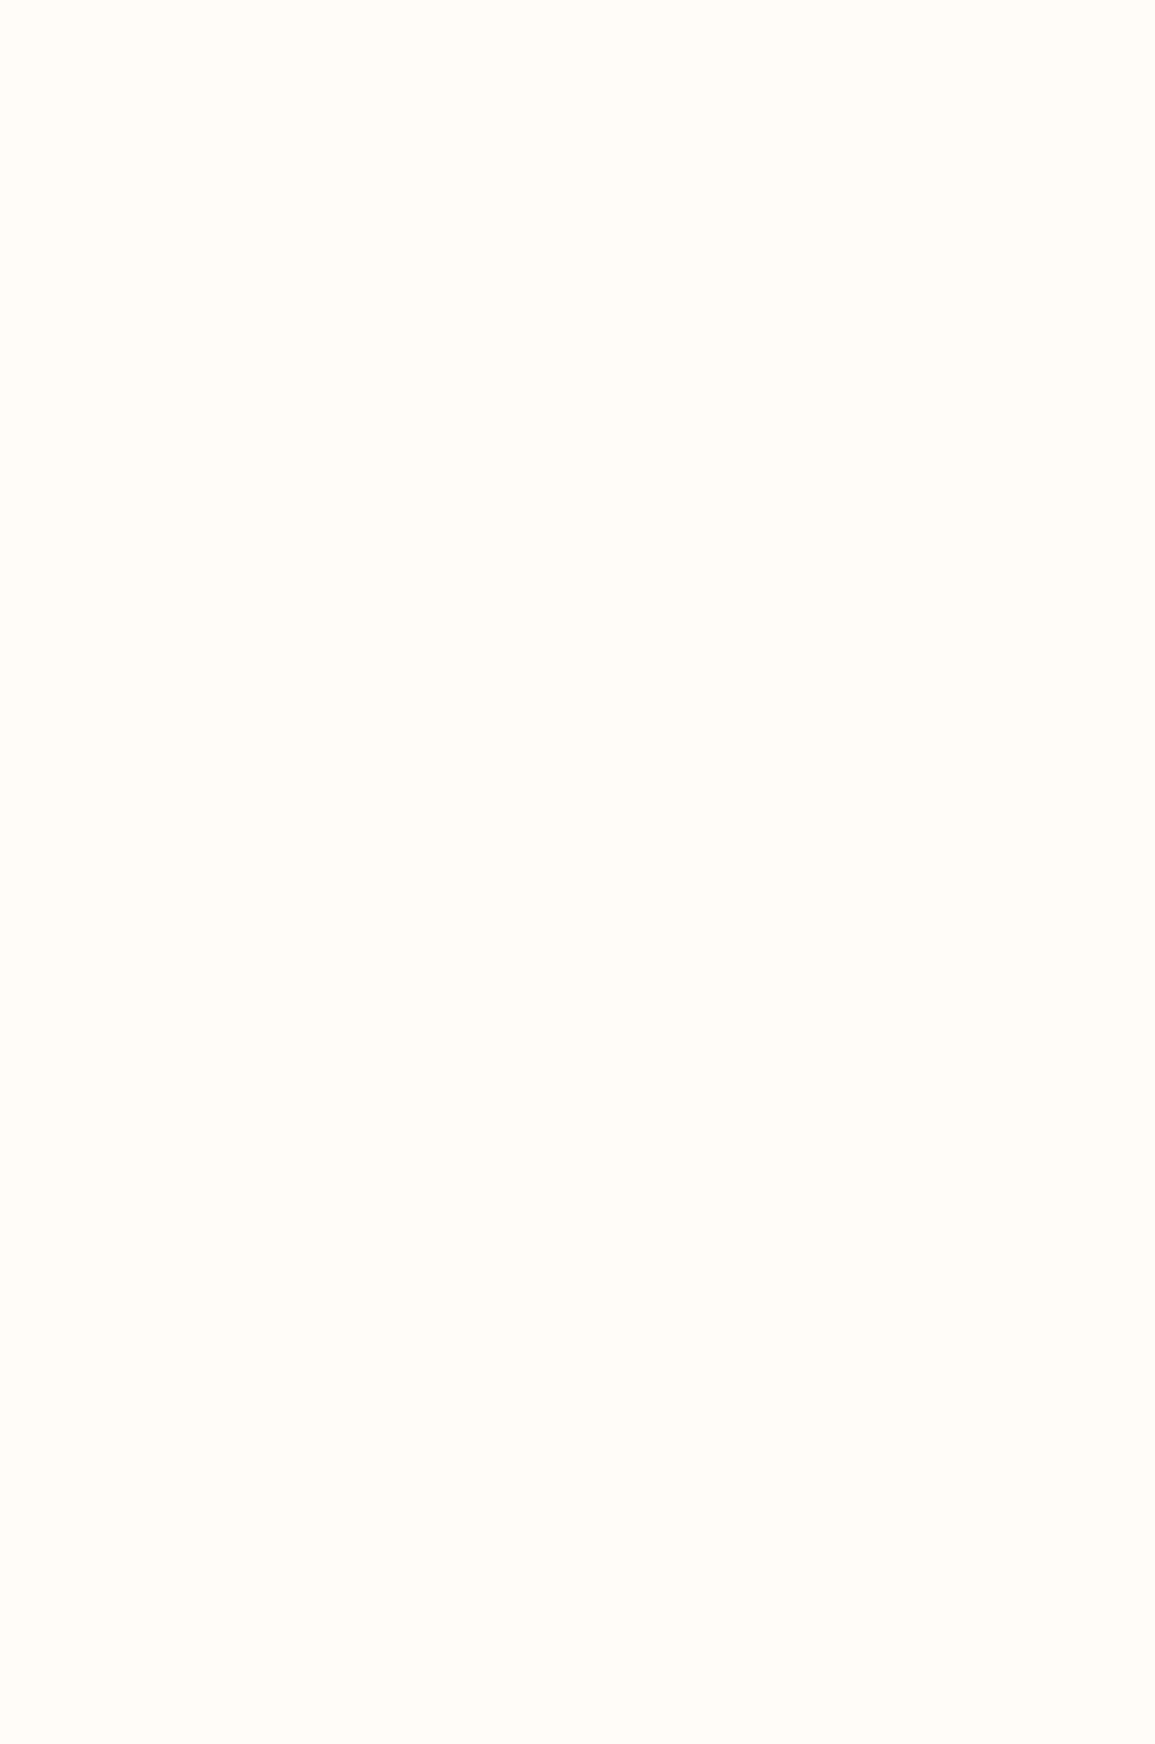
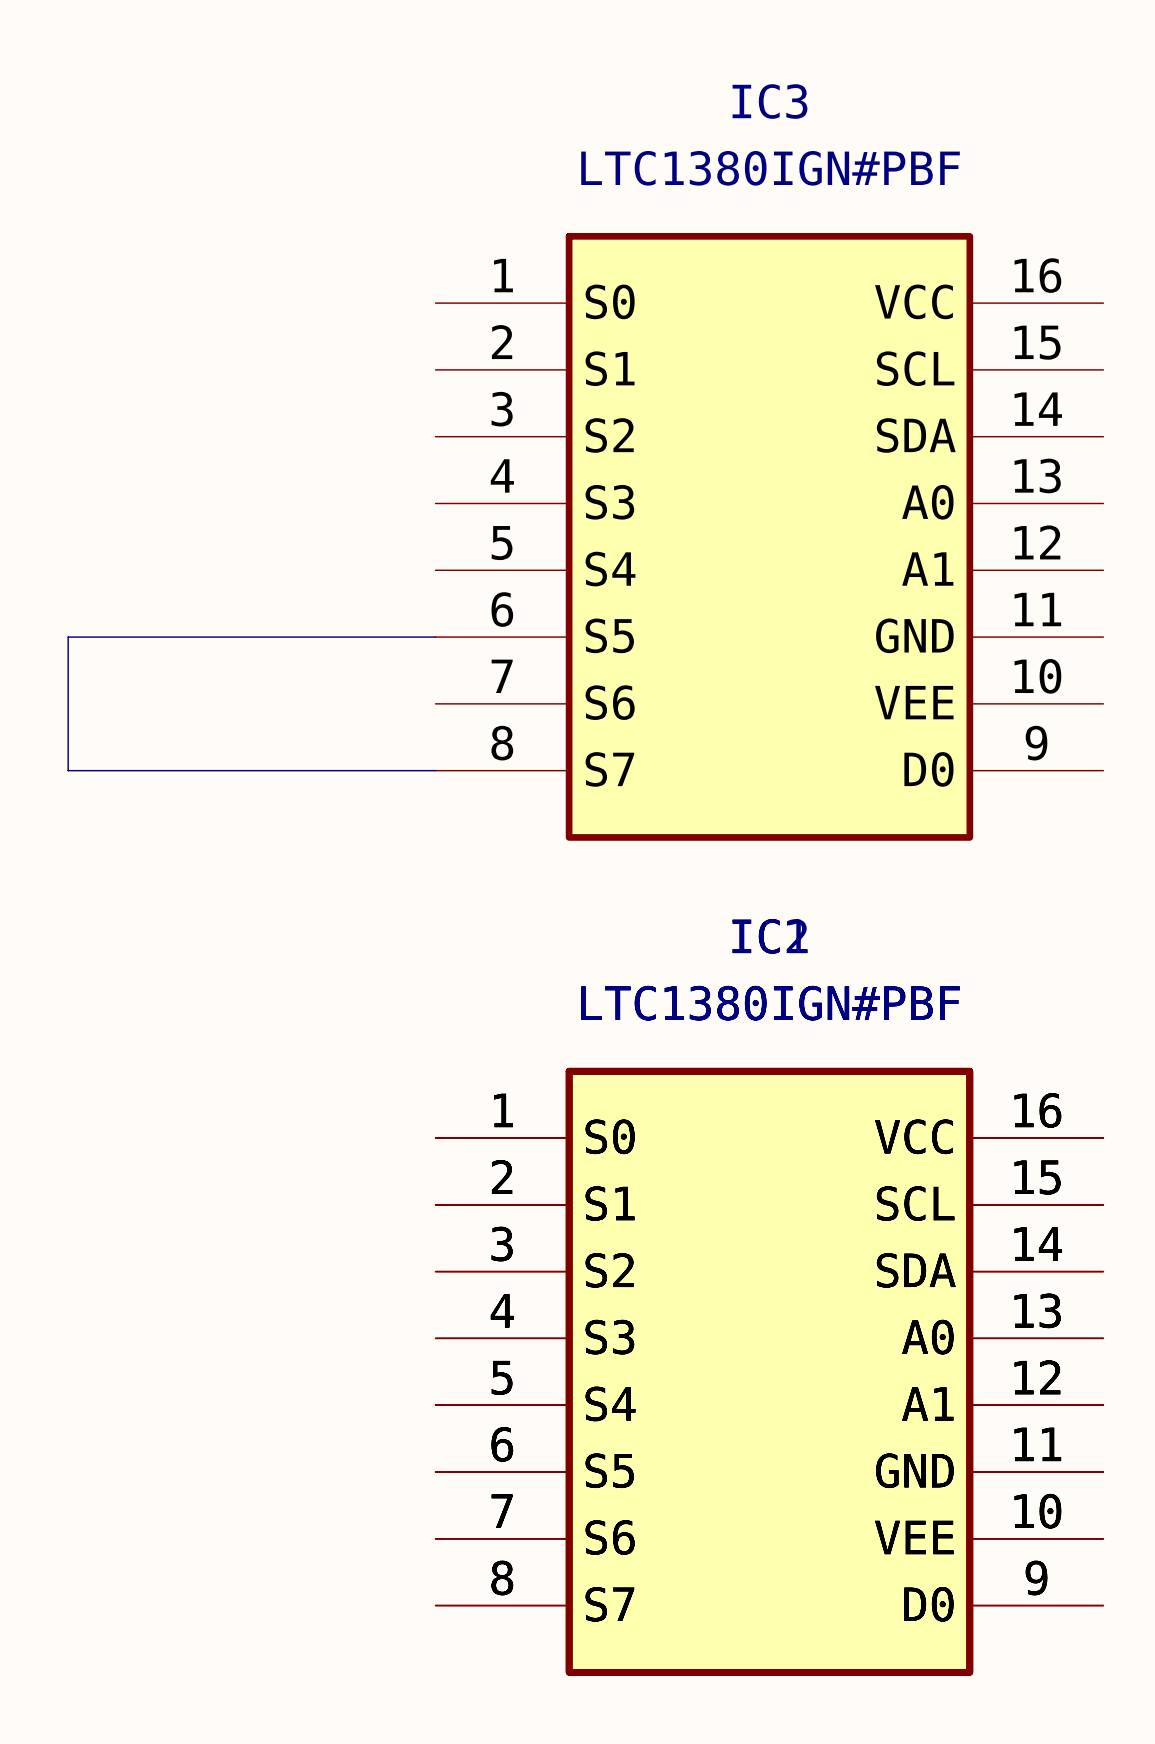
IC3: none -> LTC1380IGN#PBF (769, 536)
wire: none -> (435, 637) (68, 637) (68, 770) (435, 770)
part: none -> LTC1380IGN#PBF (769, 1371)
part: none -> LTC1380IGN#PBF (769, 1371)

